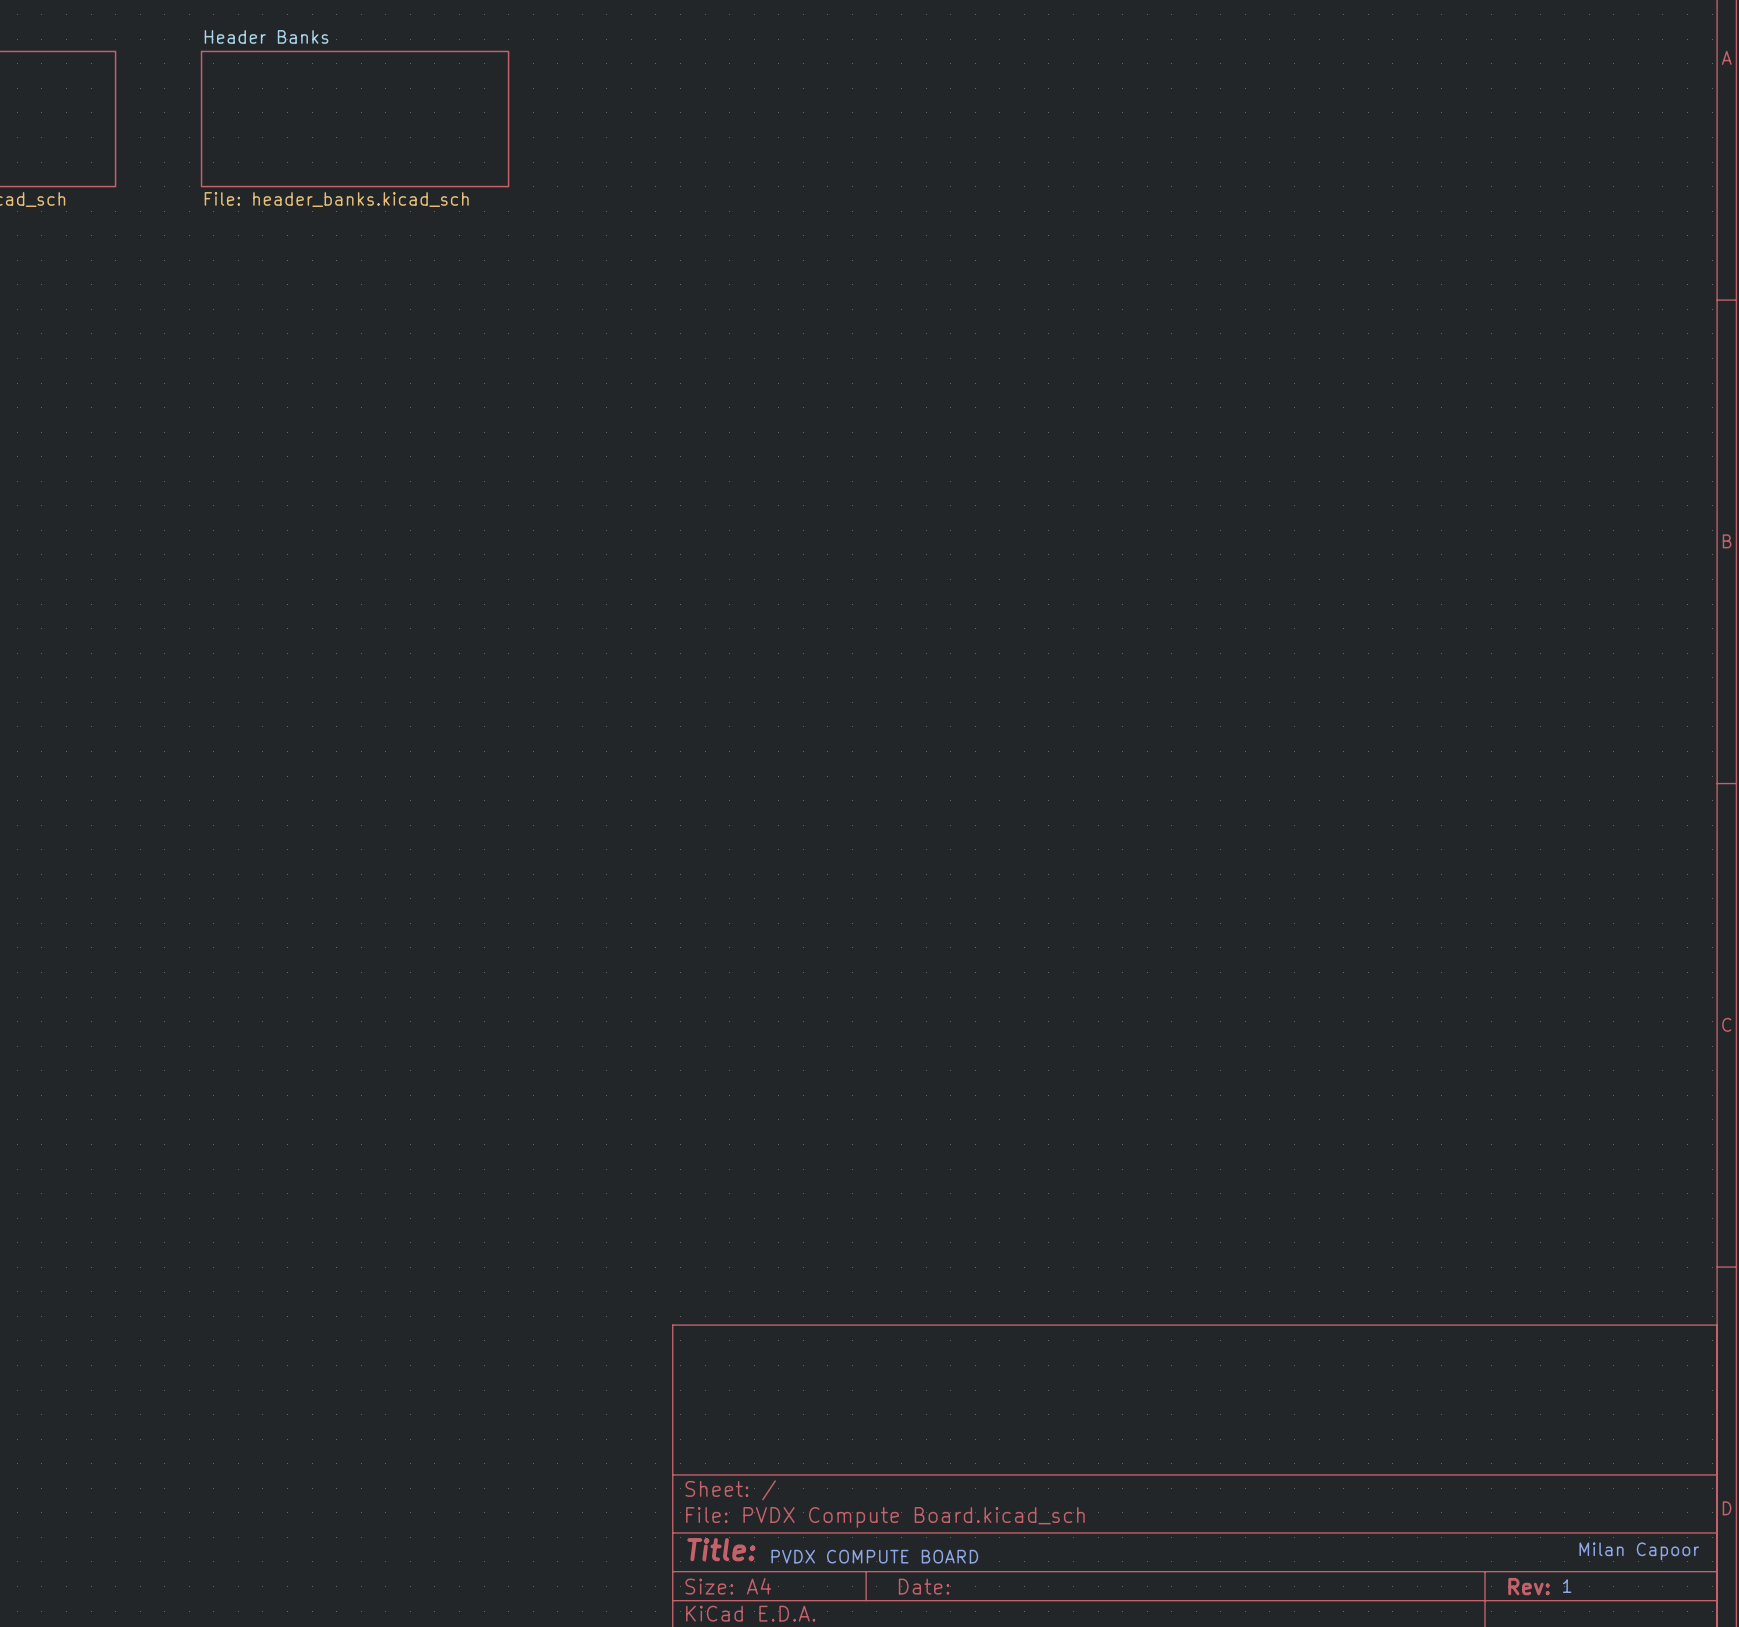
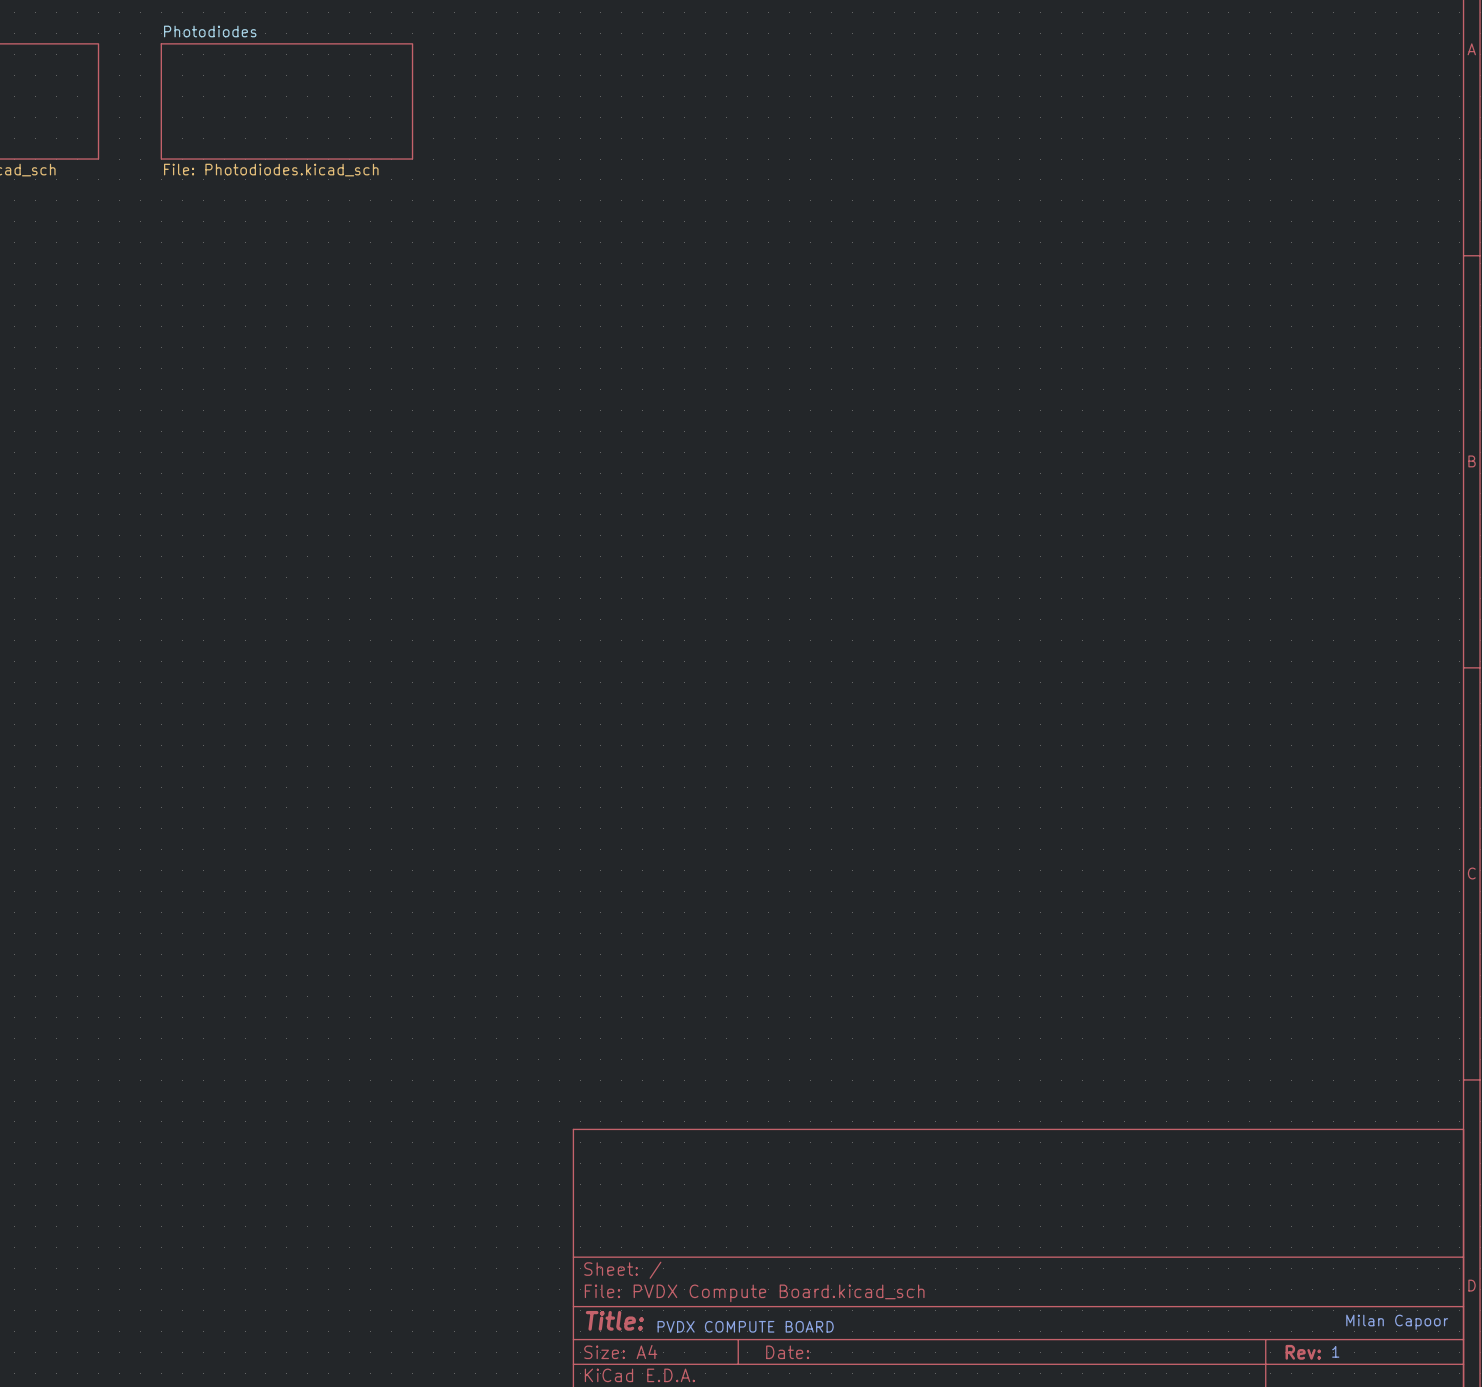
sheet Photodiodes: none -> File: Photodiodes.kicad_sch (286, 101)
sheet Header Banks: File: header_banks.kicad_sch (355, 119) -> none

